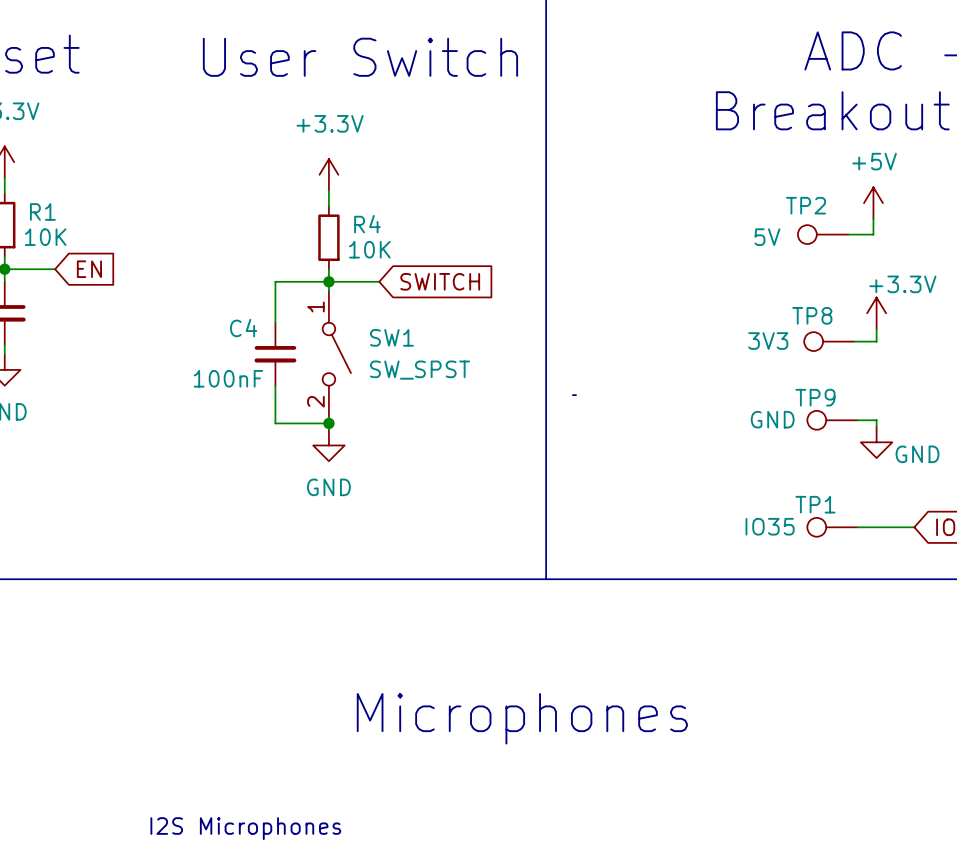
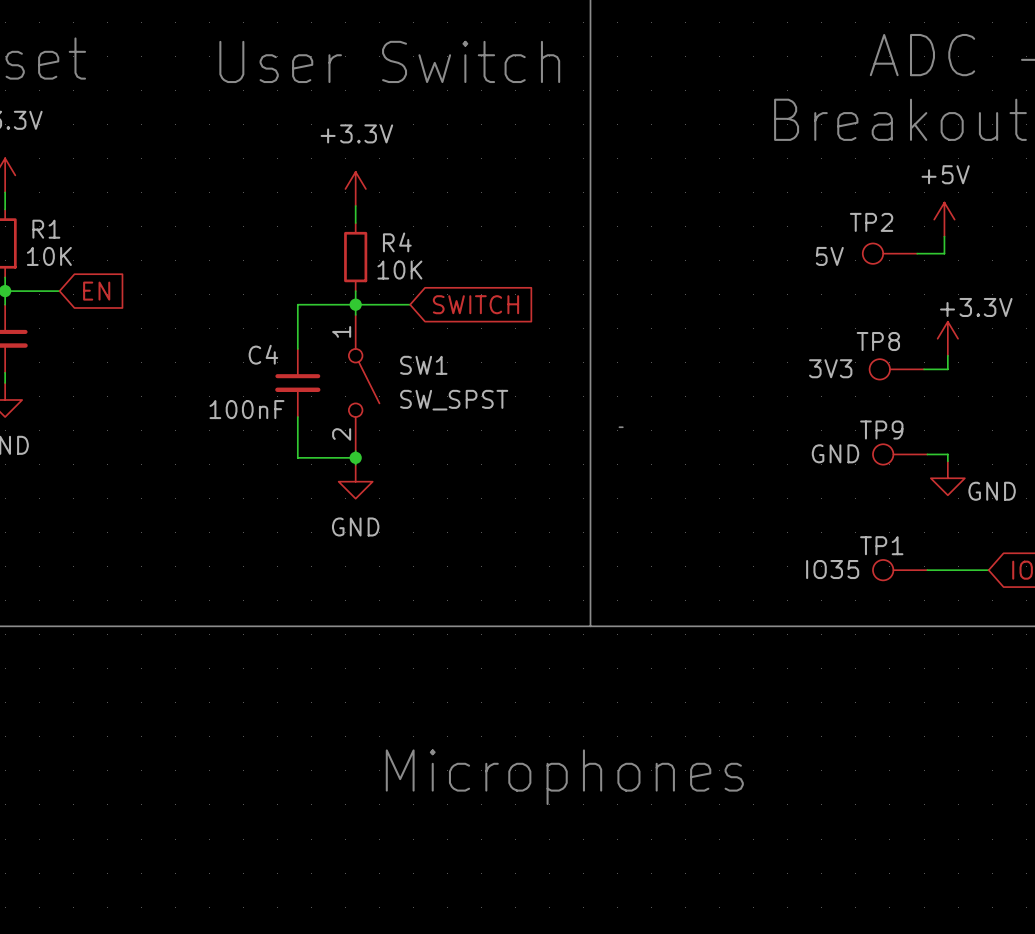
text: I2S Microphones (245, 828) -> none

